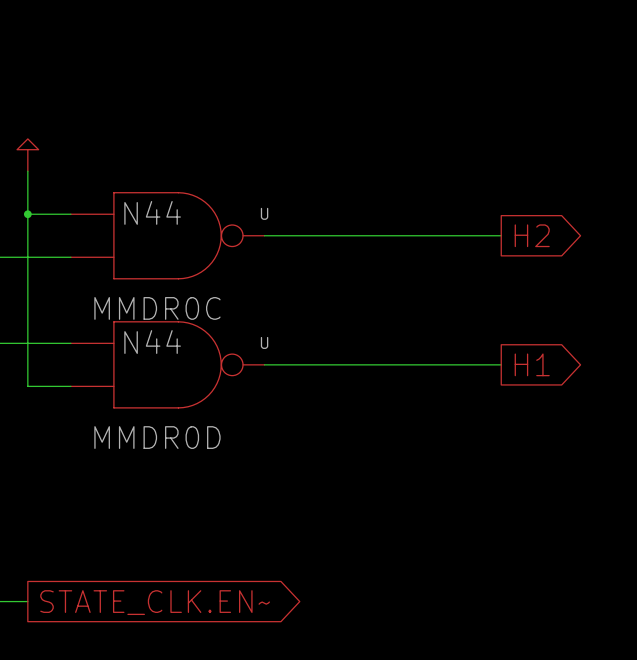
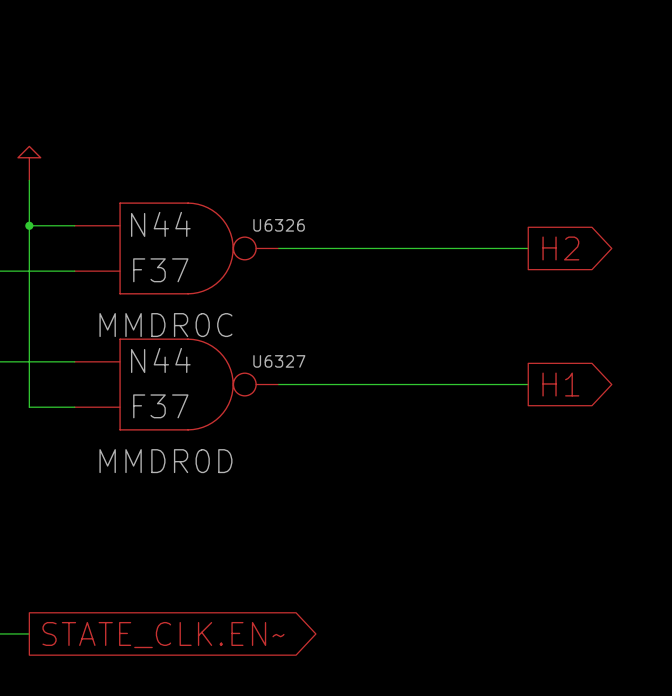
U name: U (264, 213) -> U6326 (279, 225)
U value: none -> F37 (160, 270)
U name: U (264, 342) -> U6327 (279, 361)
U value: none -> F37 (160, 406)

